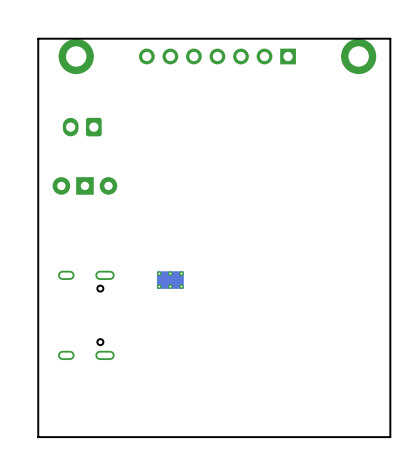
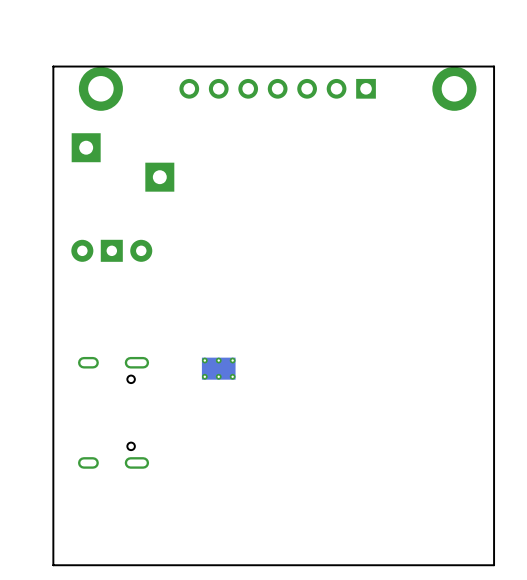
part: none -> (86, 147)
part: (82, 127) -> none
part: none -> (159, 177)

